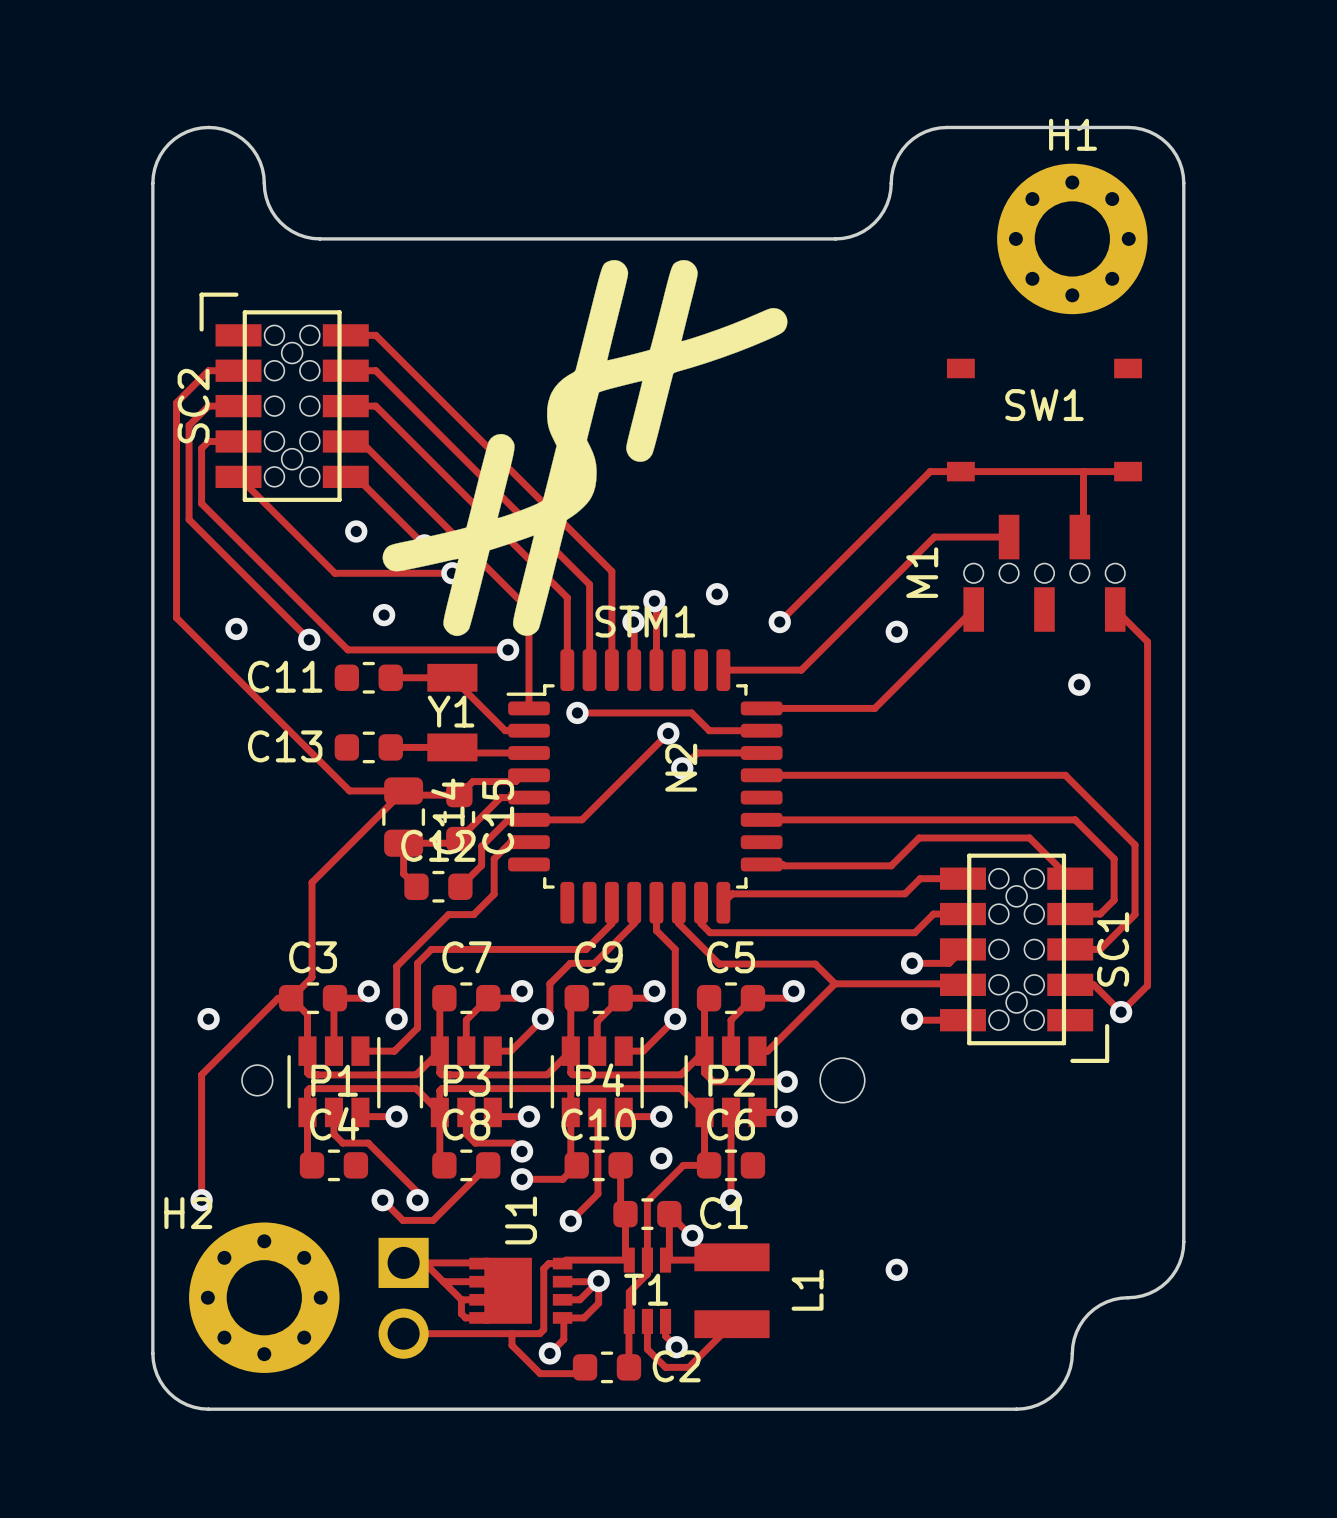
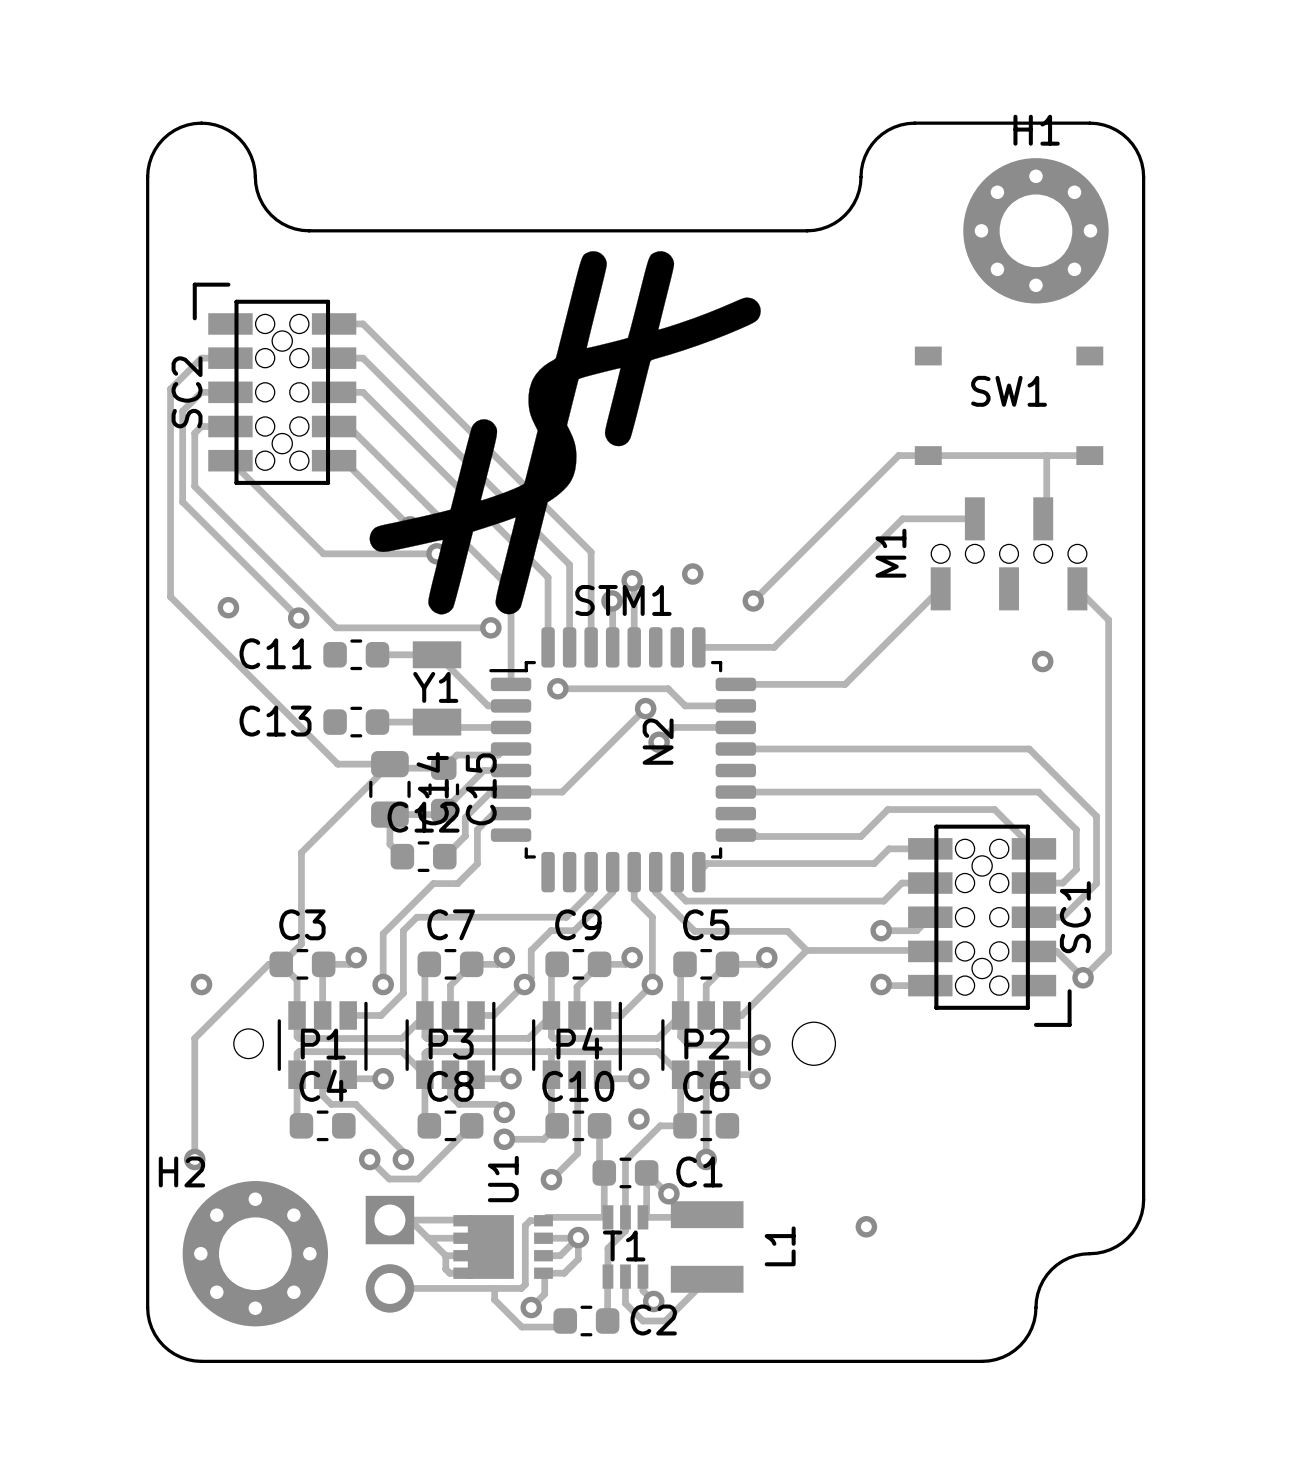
via: (356, 531) -> none
via: (384, 615) -> none
via: (896, 631) -> none

